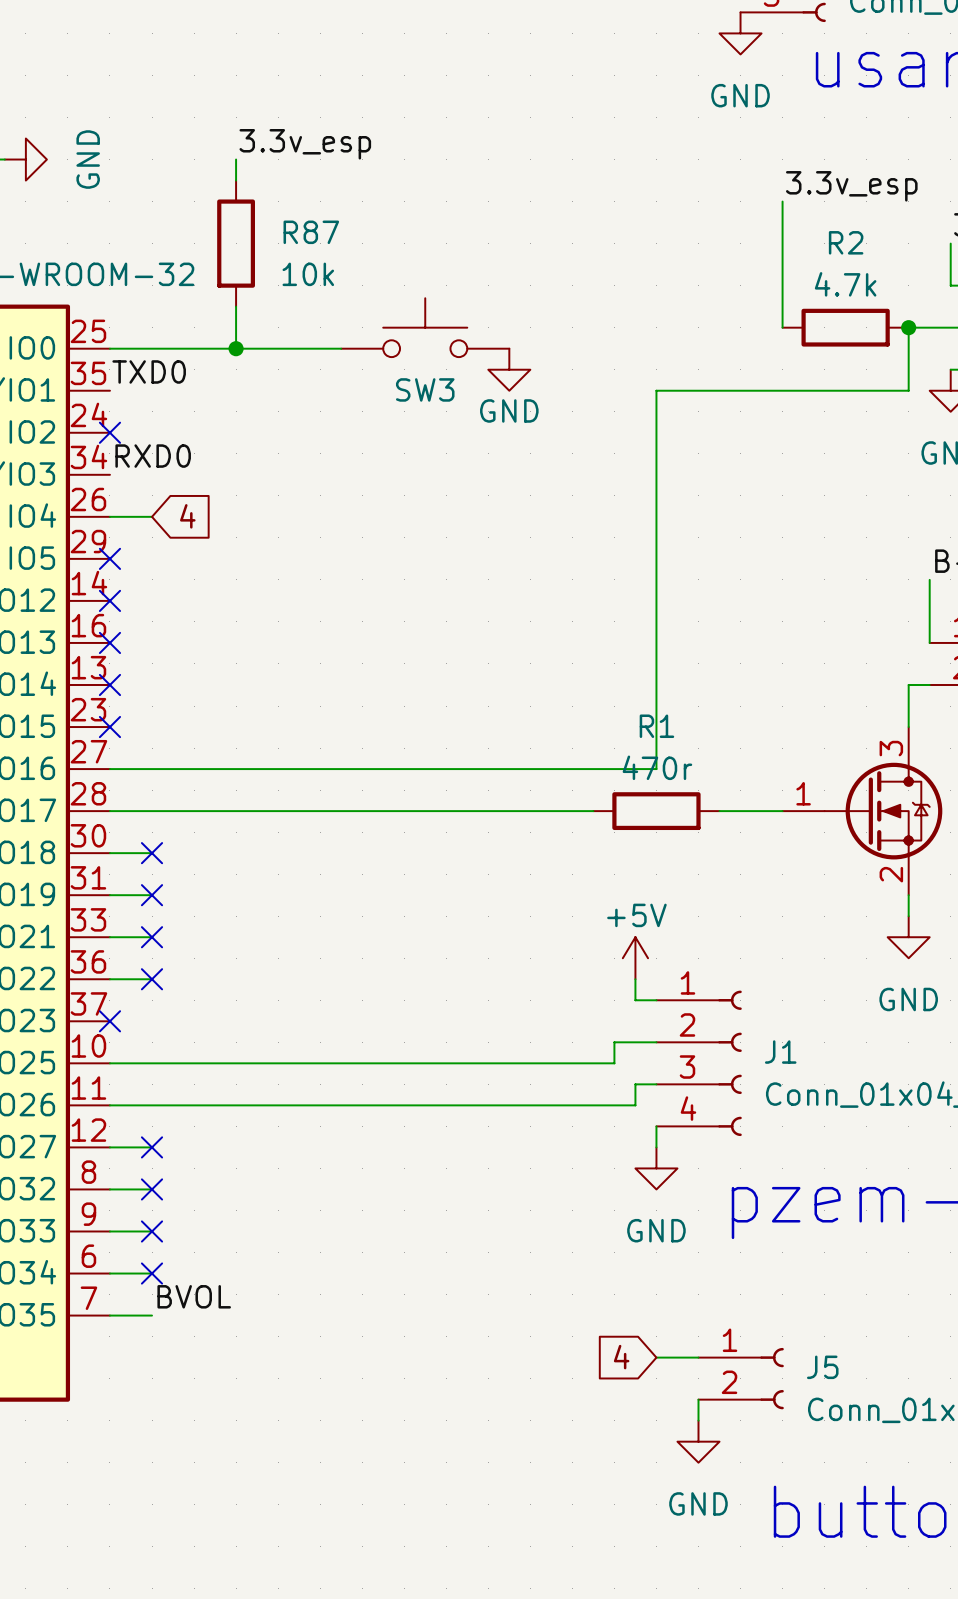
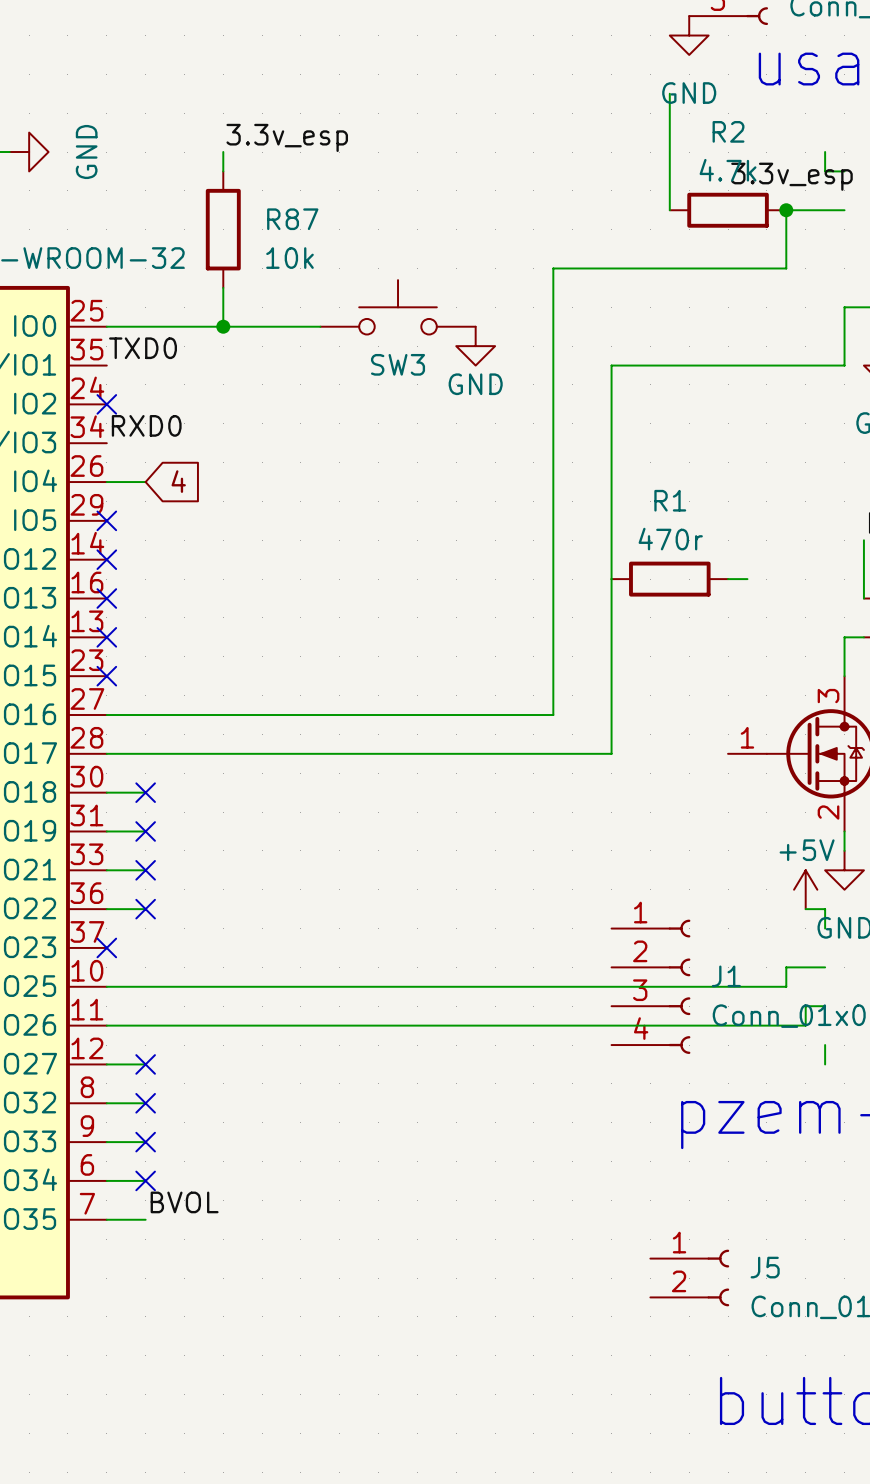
wire: none -> (825, 152) (825, 171) (844, 171)
wire: (782, 201) (782, 327) -> (669, 93) (669, 210)
junction: none -> (786, 210)
wire: none -> (844, 210) (786, 210) (786, 268) (553, 268) (553, 715)
R2 position: (845, 327) -> (728, 210)
junction: (908, 327) -> none
wire: none -> (728, 579) (747, 579)
wire: (593, 769) (656, 769) -> (553, 753) (611, 753) (611, 715)
R1 position: (656, 811) -> (669, 579)
wire: (719, 811) (782, 811) -> none
power symbol position: +5V (635, 958) -> +5V (805, 889)
wire: (635, 979) (635, 1000) (656, 1000) -> none
wire: none -> (805, 909) (825, 909) (825, 928)
wire: (656, 1042) (614, 1042) (614, 1063) -> (825, 967) (786, 967) (786, 986) (572, 986)
wire: (656, 1084) (635, 1084) (635, 1105) -> (825, 1006) (805, 1006) (805, 1025) (592, 1025)
wire: (656, 1126) (656, 1147) -> (825, 1045) (825, 1064)
power symbol: GND (656, 1168) -> none
global label: 4 (621, 1357) -> none
wire: (656, 1357) (698, 1357) -> none
wire: (698, 1399) (698, 1420) -> none
power symbol: GND (698, 1441) -> none

